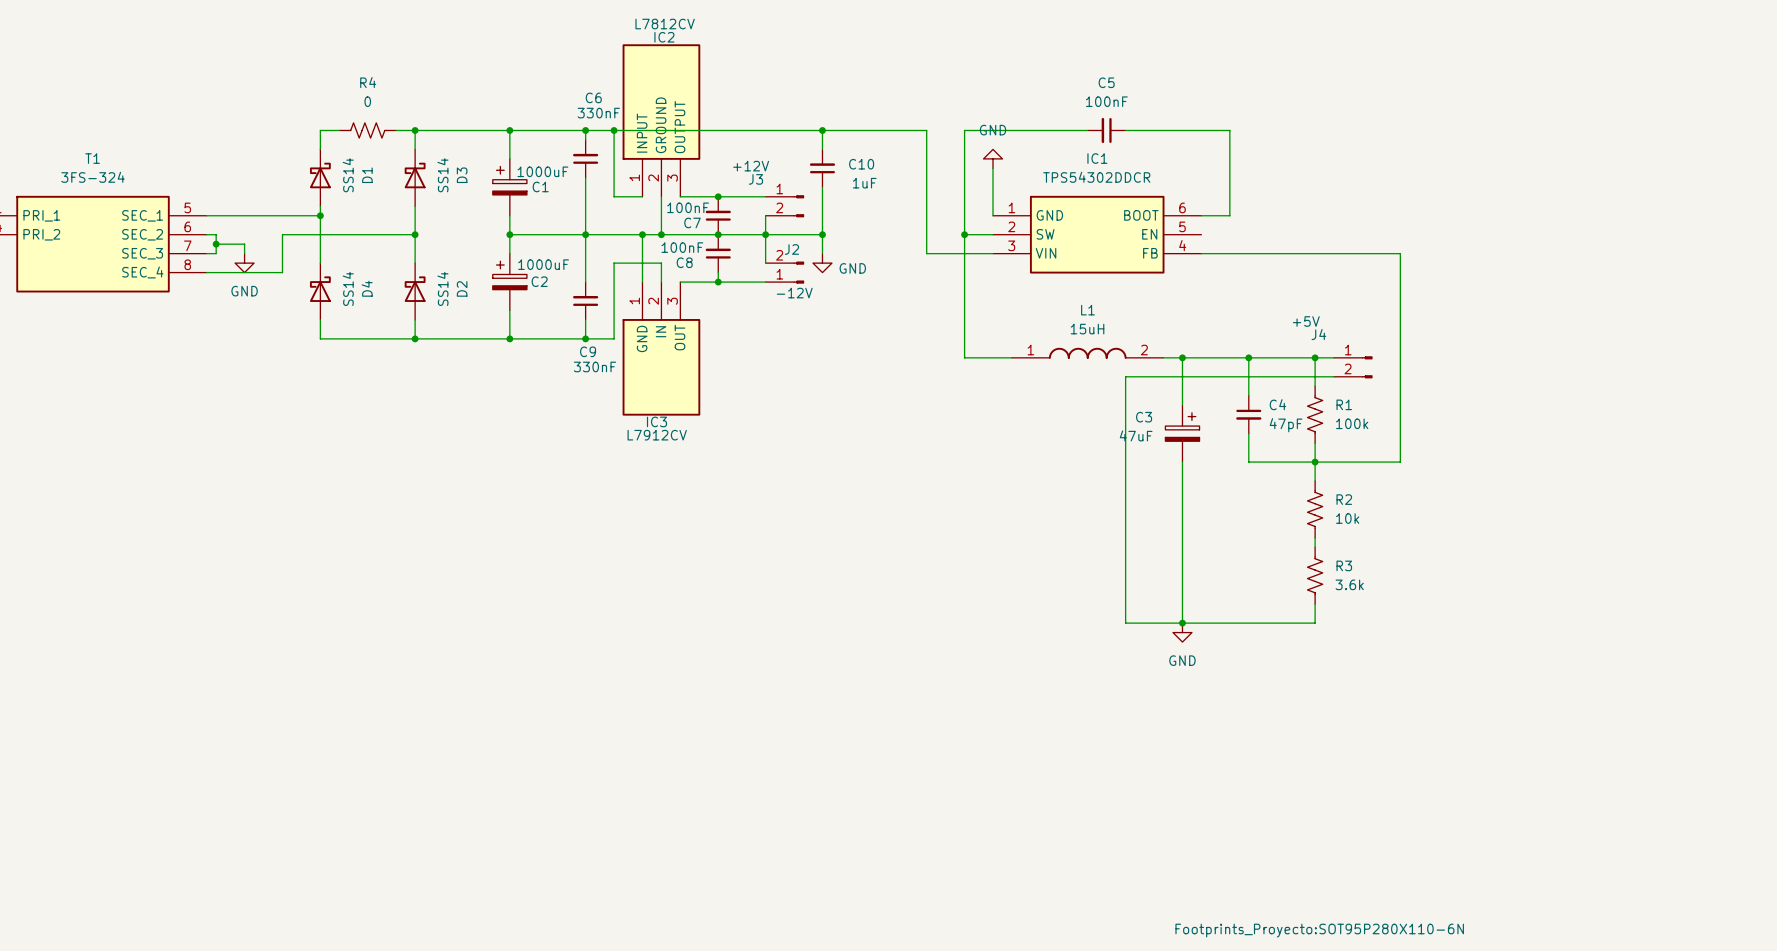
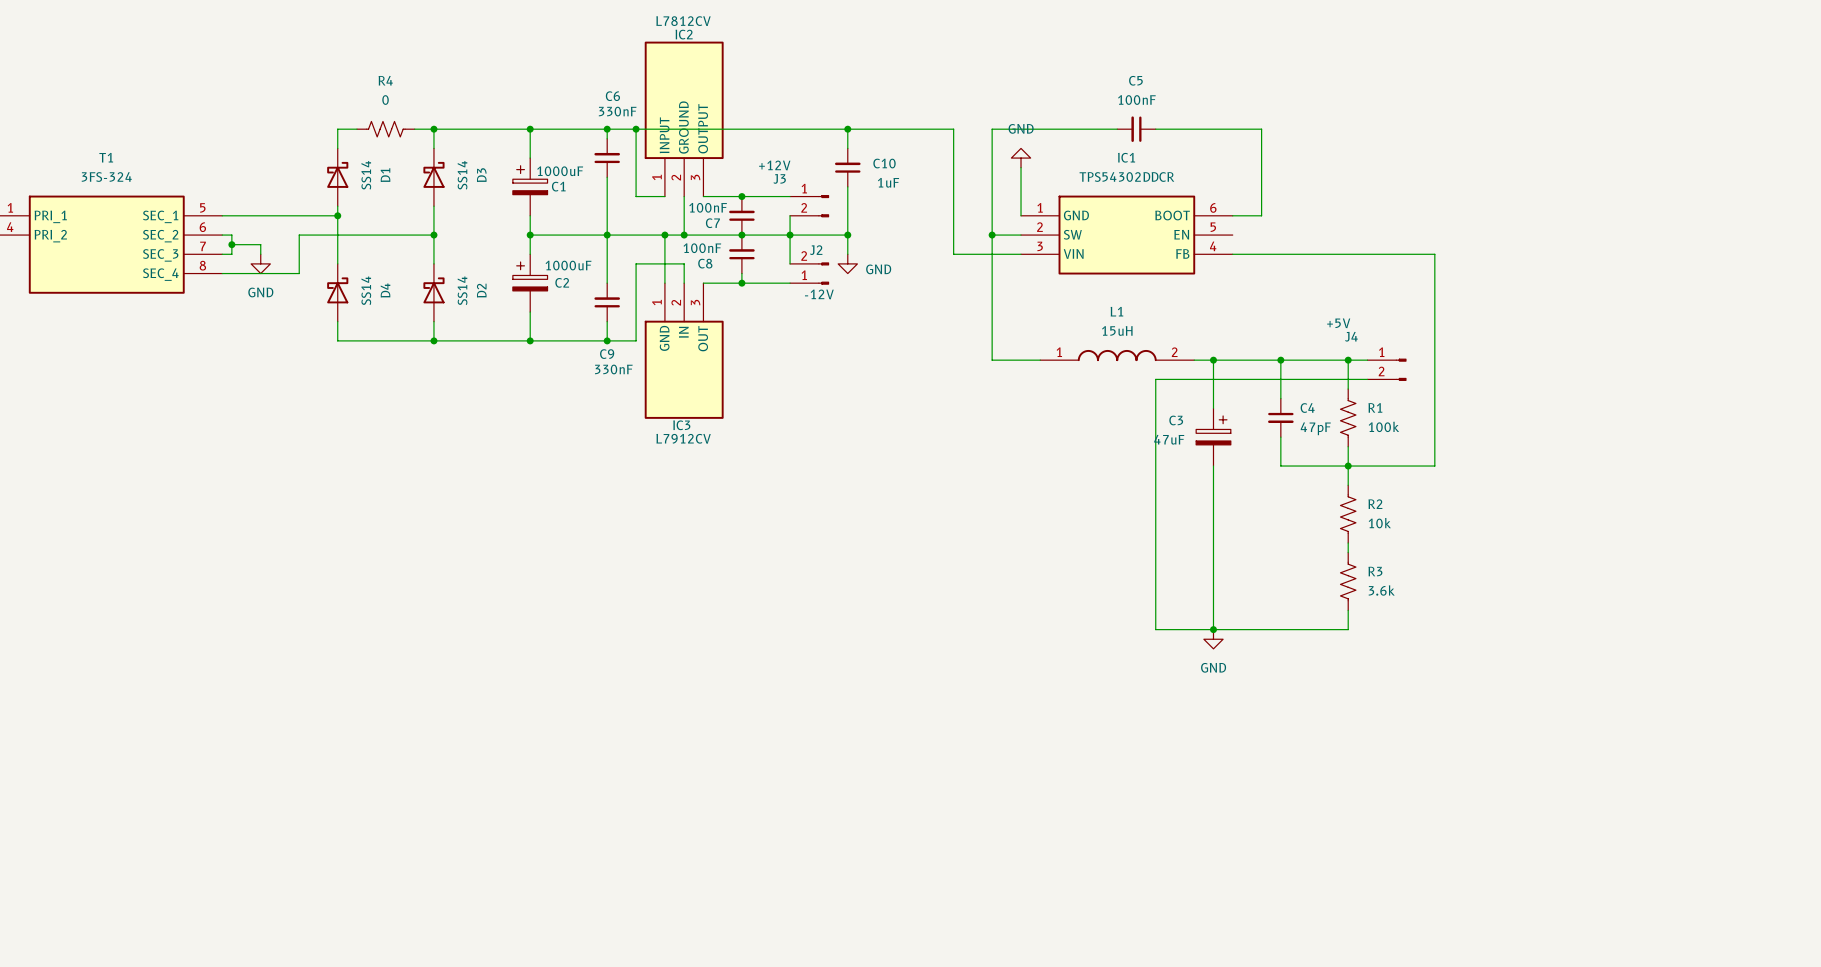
IC1 text: Footprints_Proyecto:SOT95P280X110-6N (1319, 930) -> none

